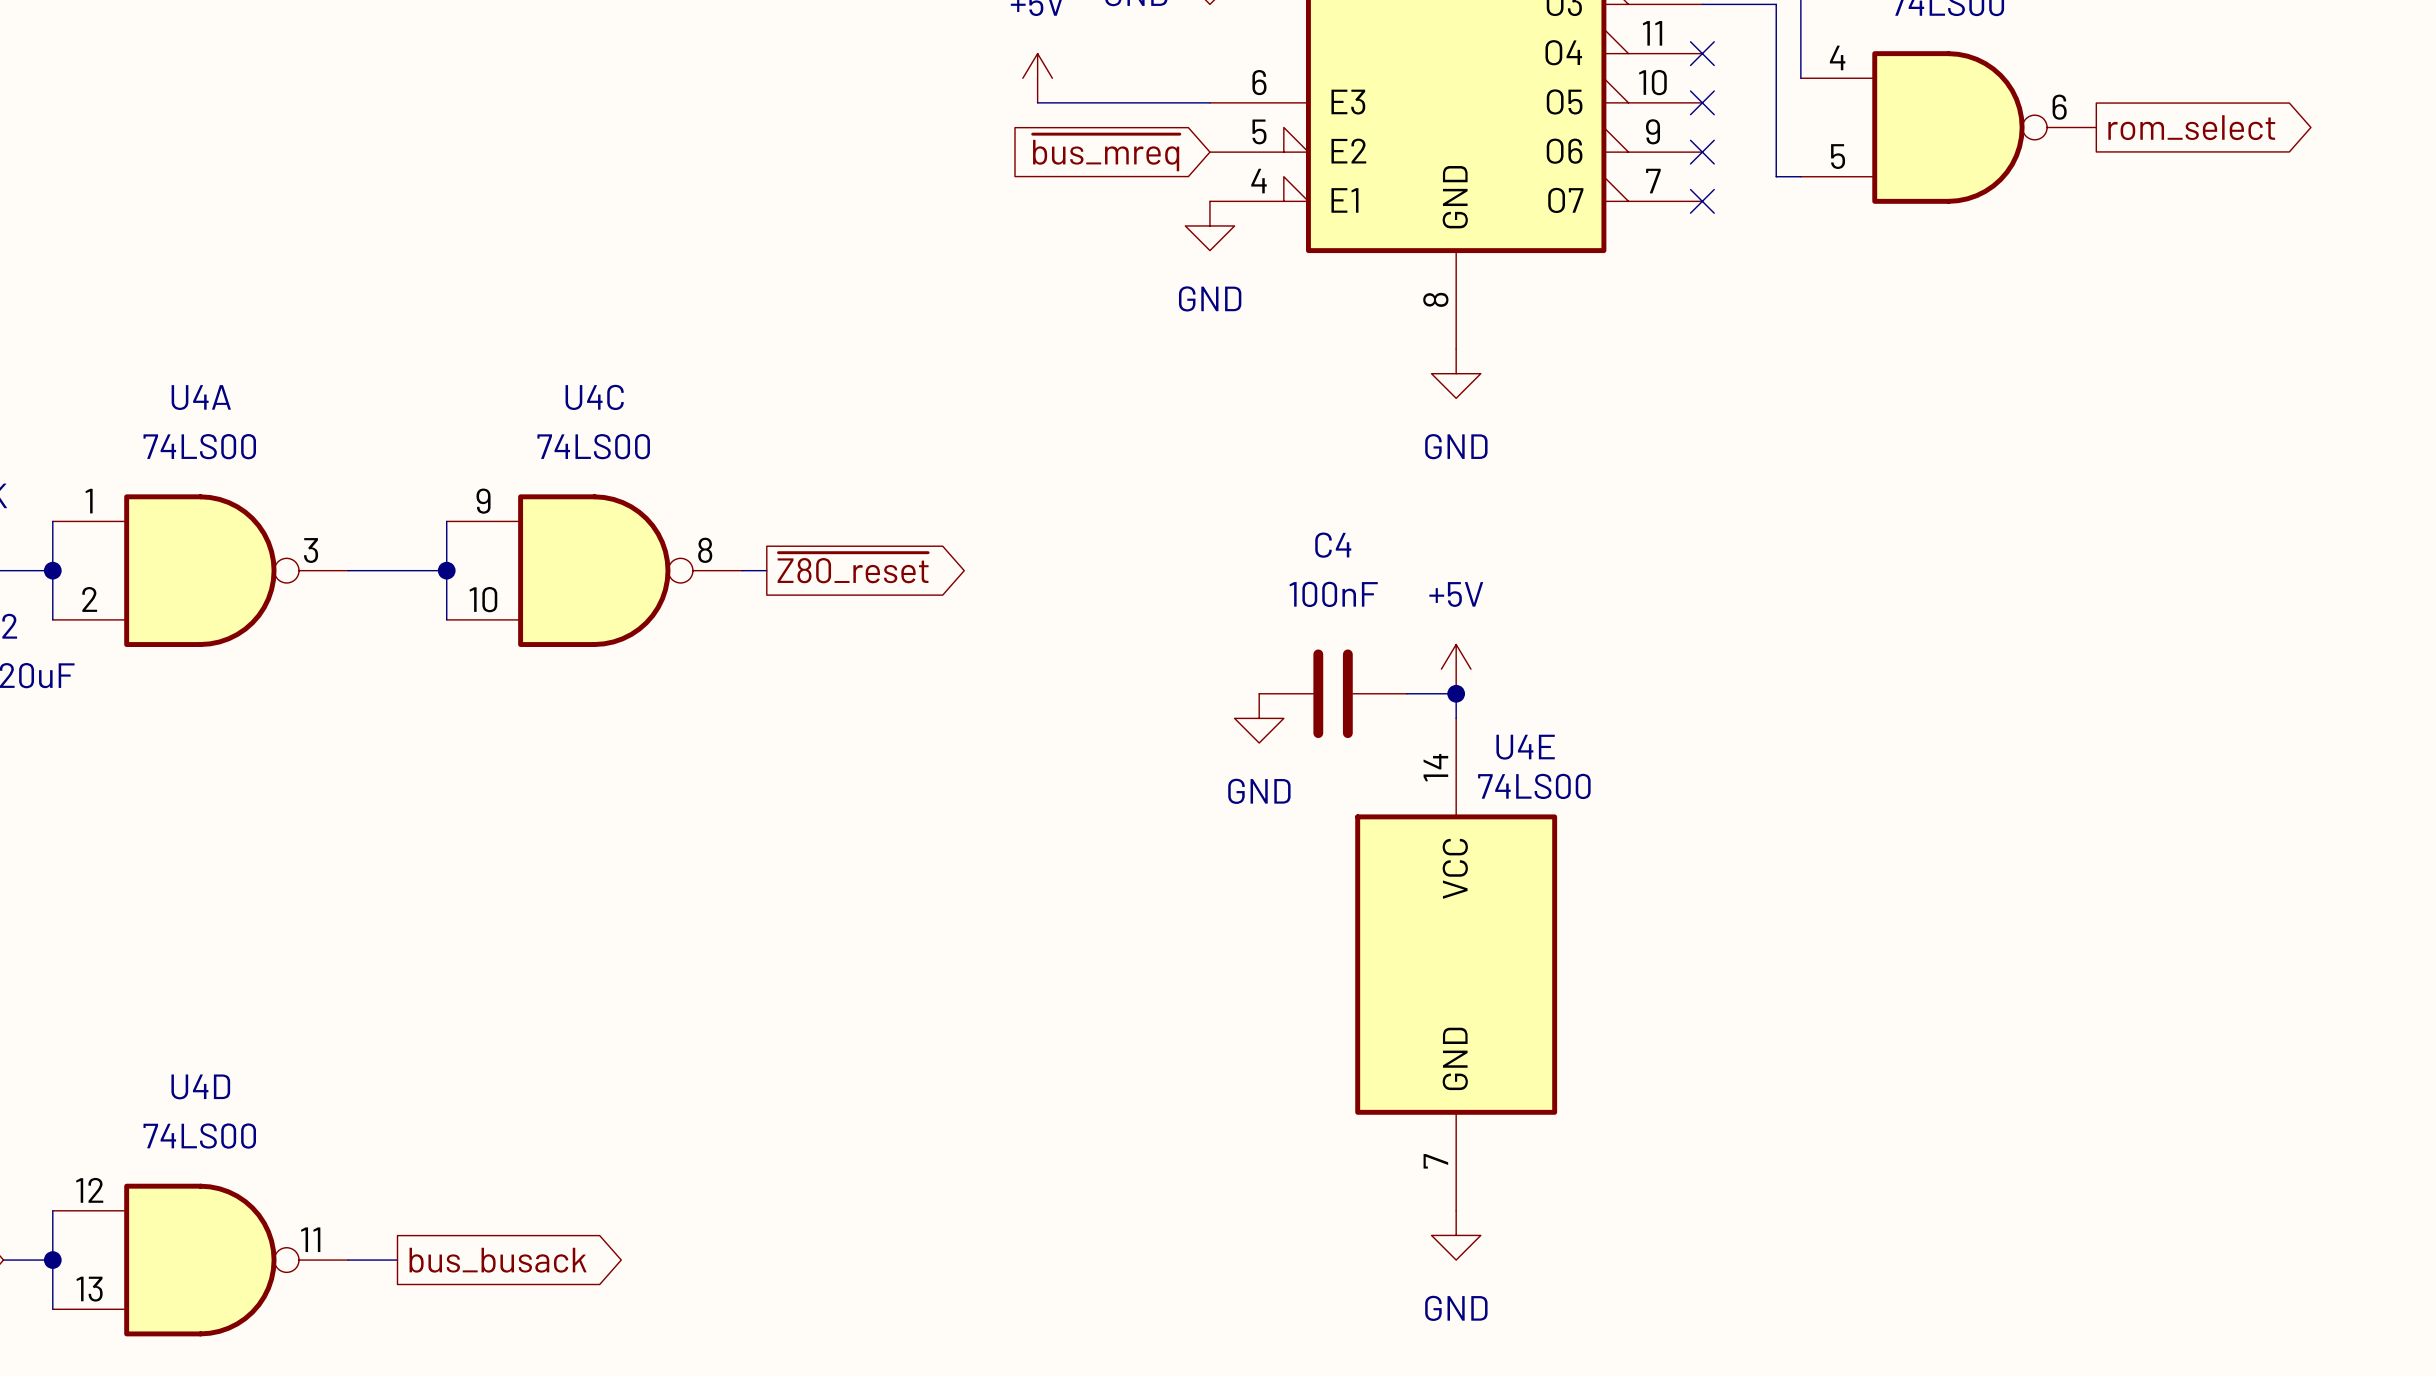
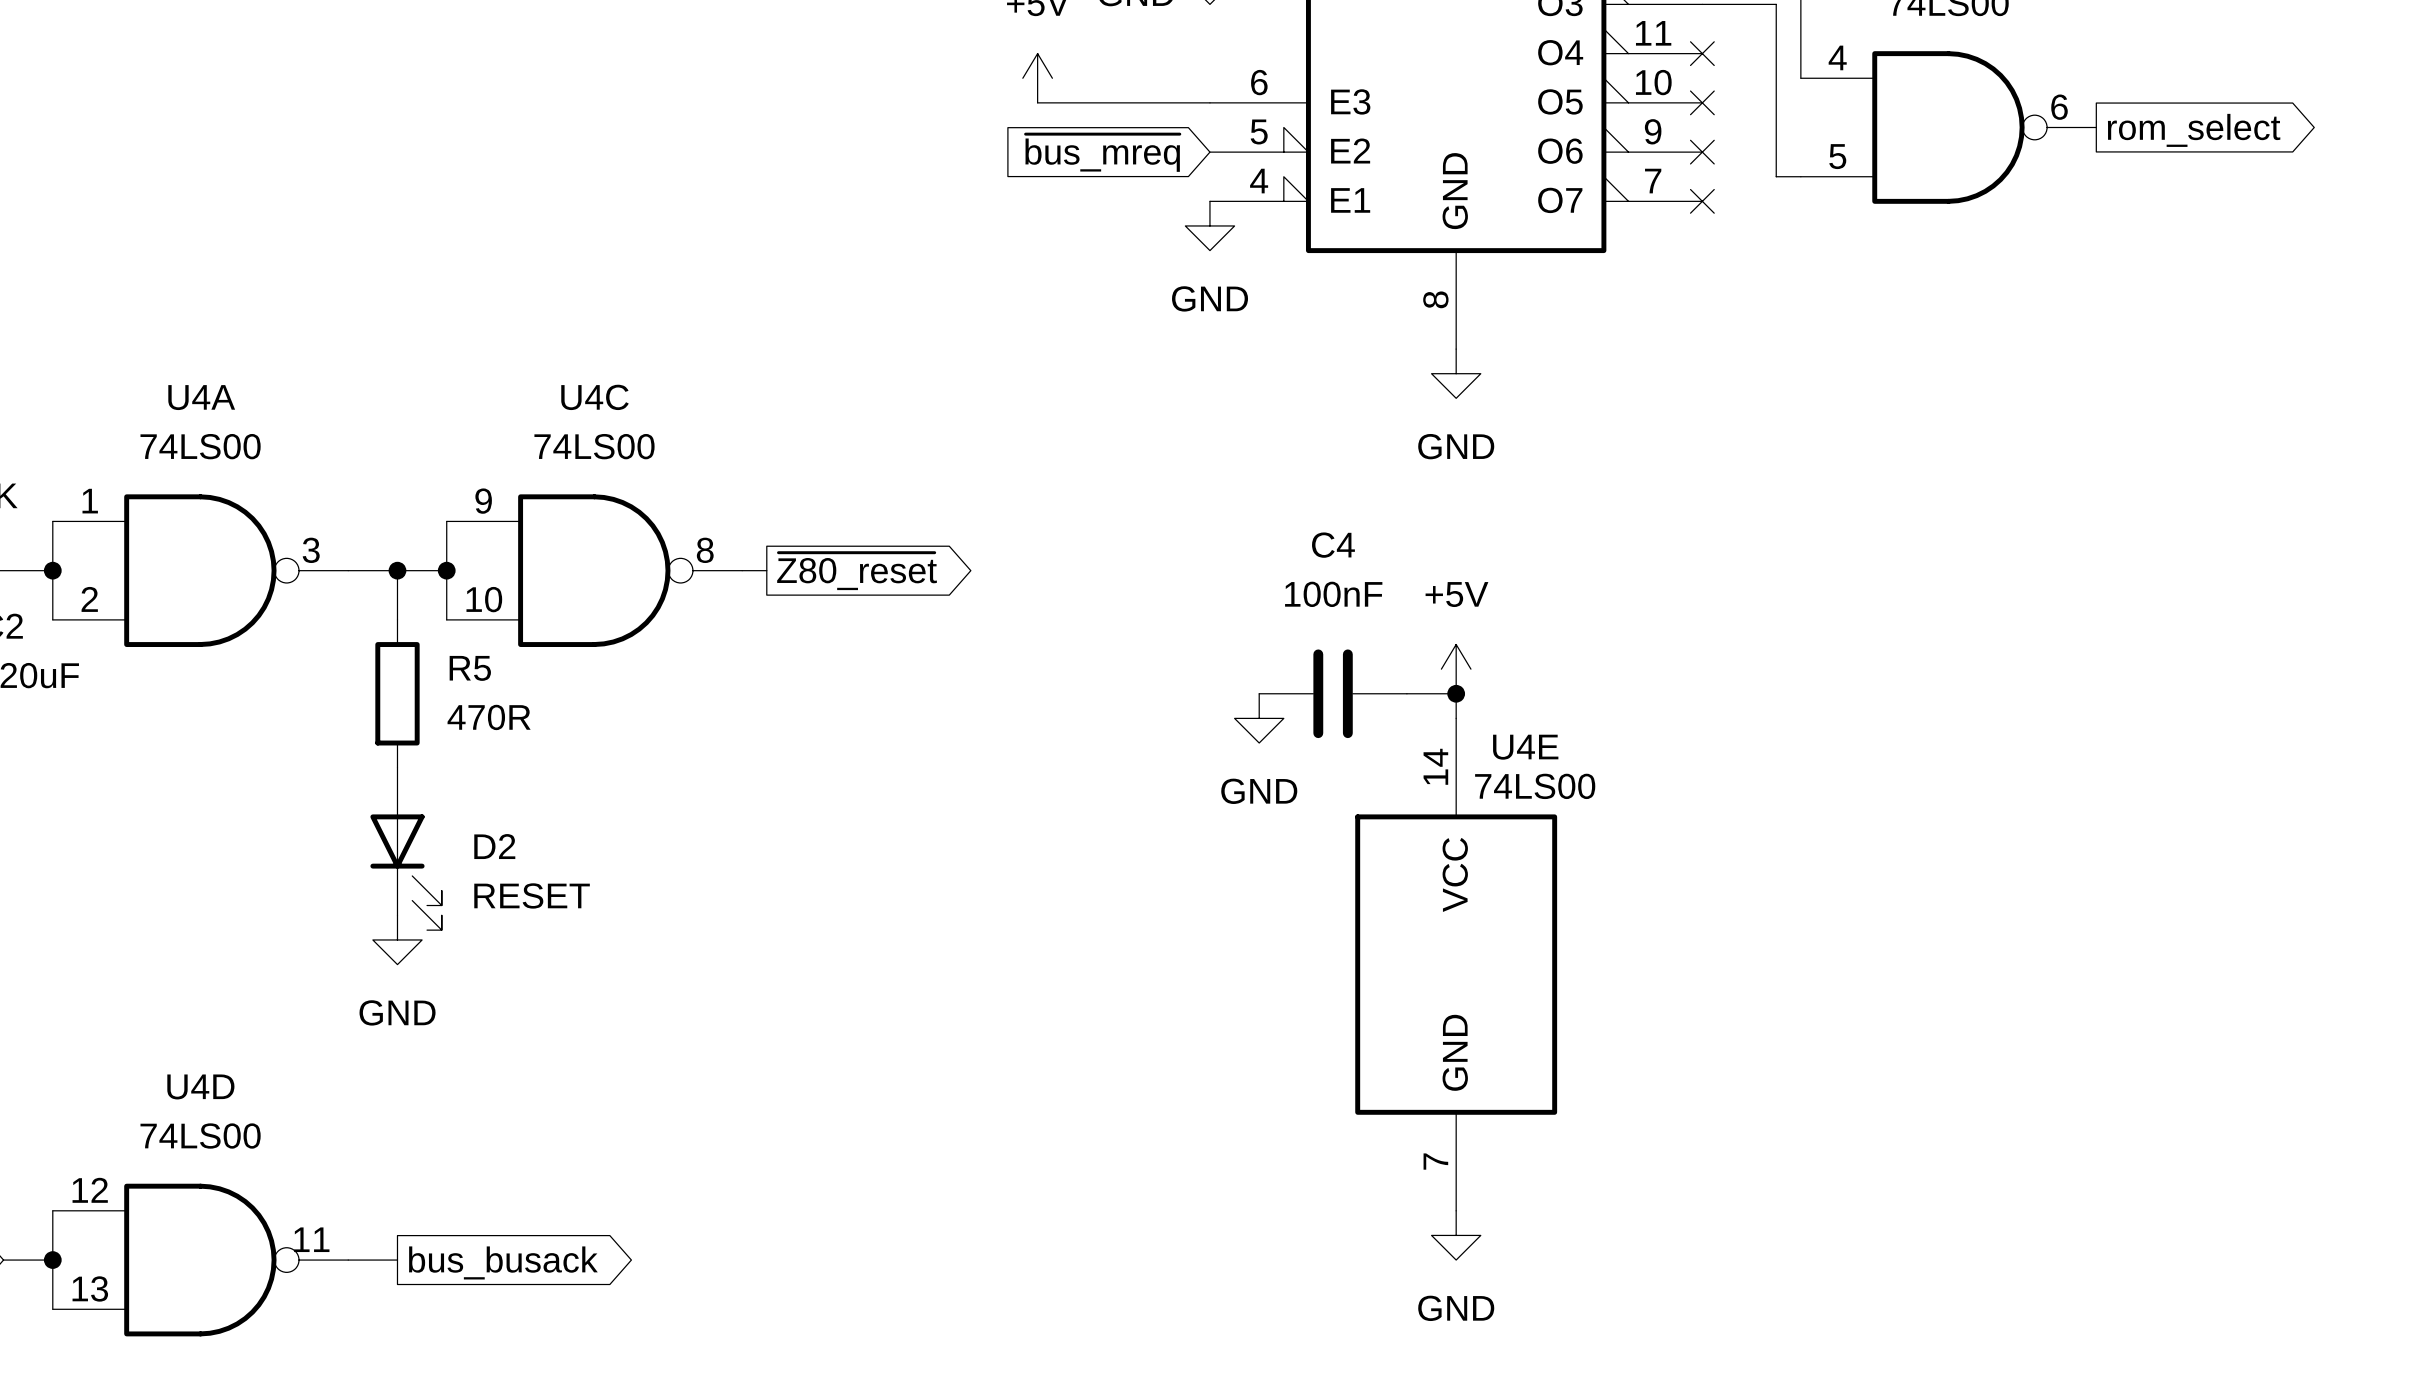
wire: none -> (397, 570) (397, 619)
junction: none -> (397, 570)
R5: none -> 470R (397, 693)
D2: none -> RESET (406, 848)
power symbol: none -> GND (397, 939)

